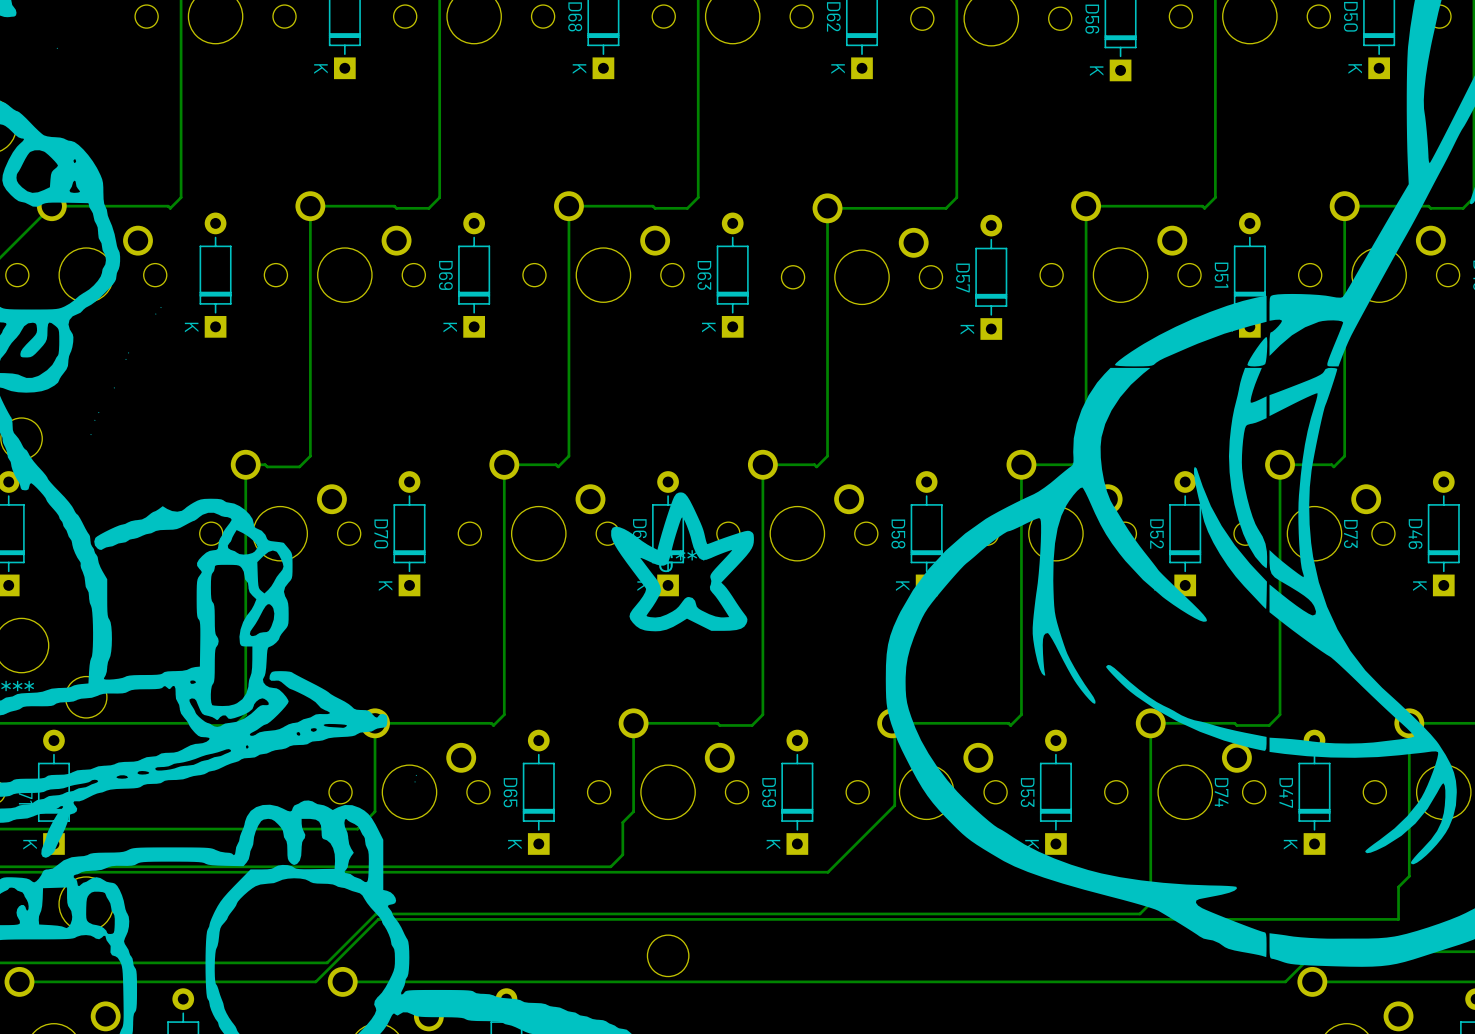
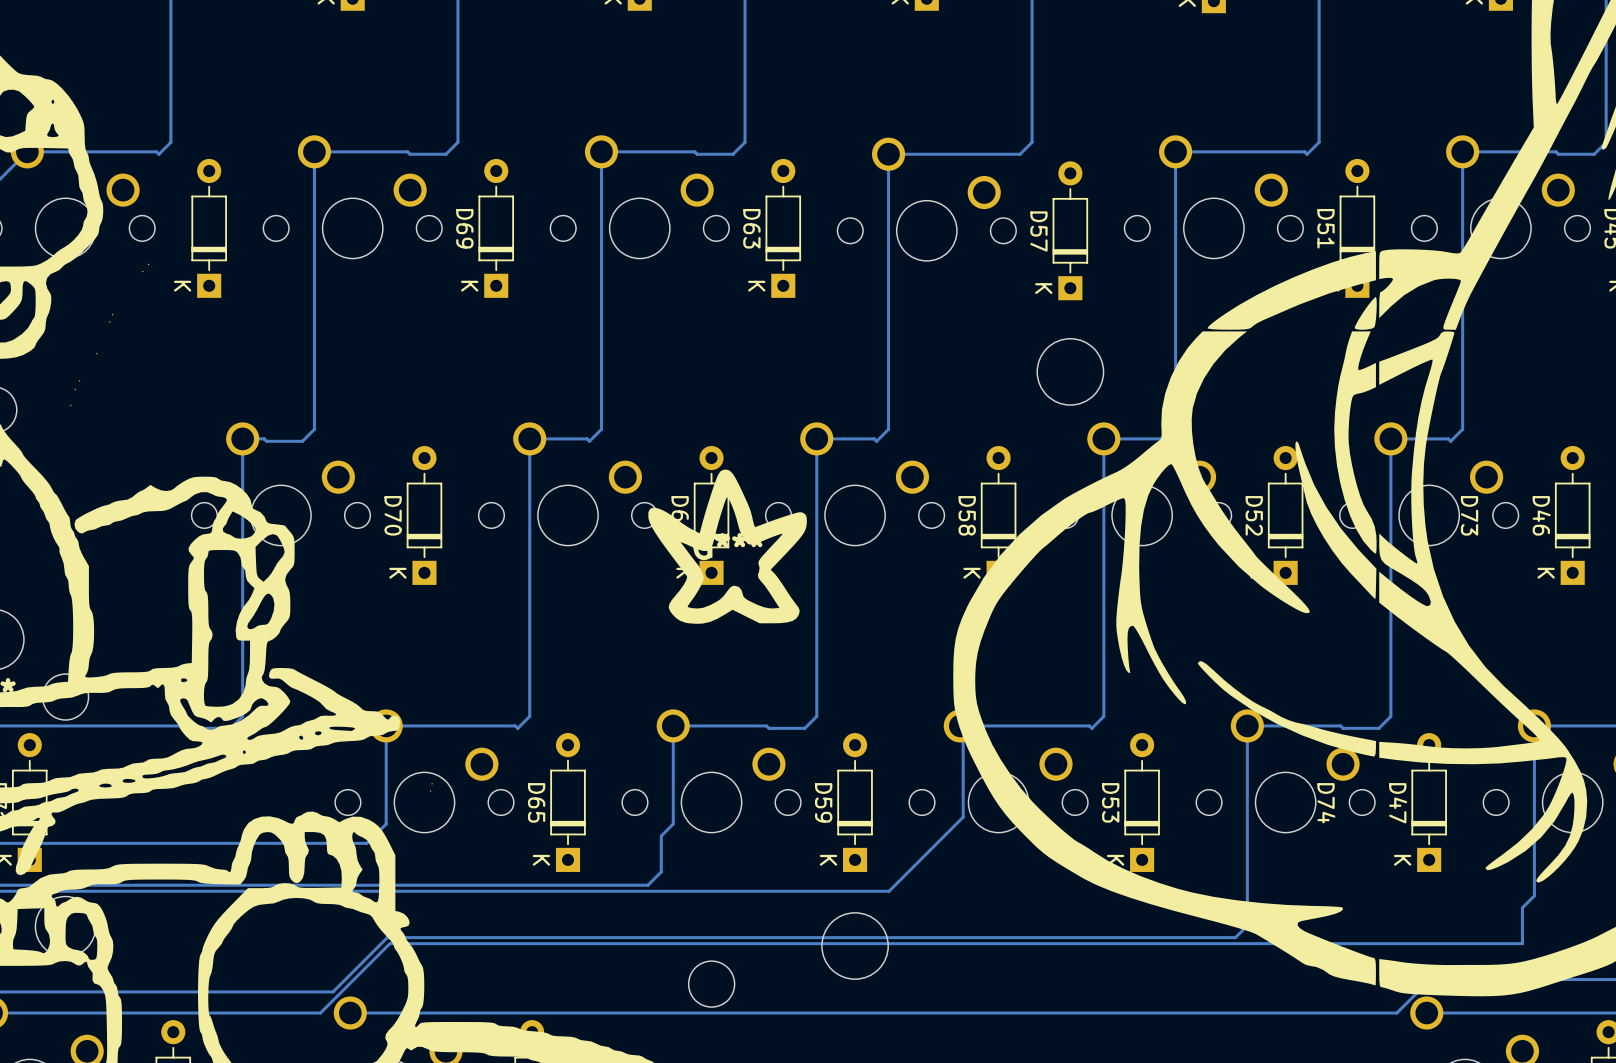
round board edge: none -> [1036, 338, 1104, 406]
round board edge: none -> [821, 912, 889, 980]

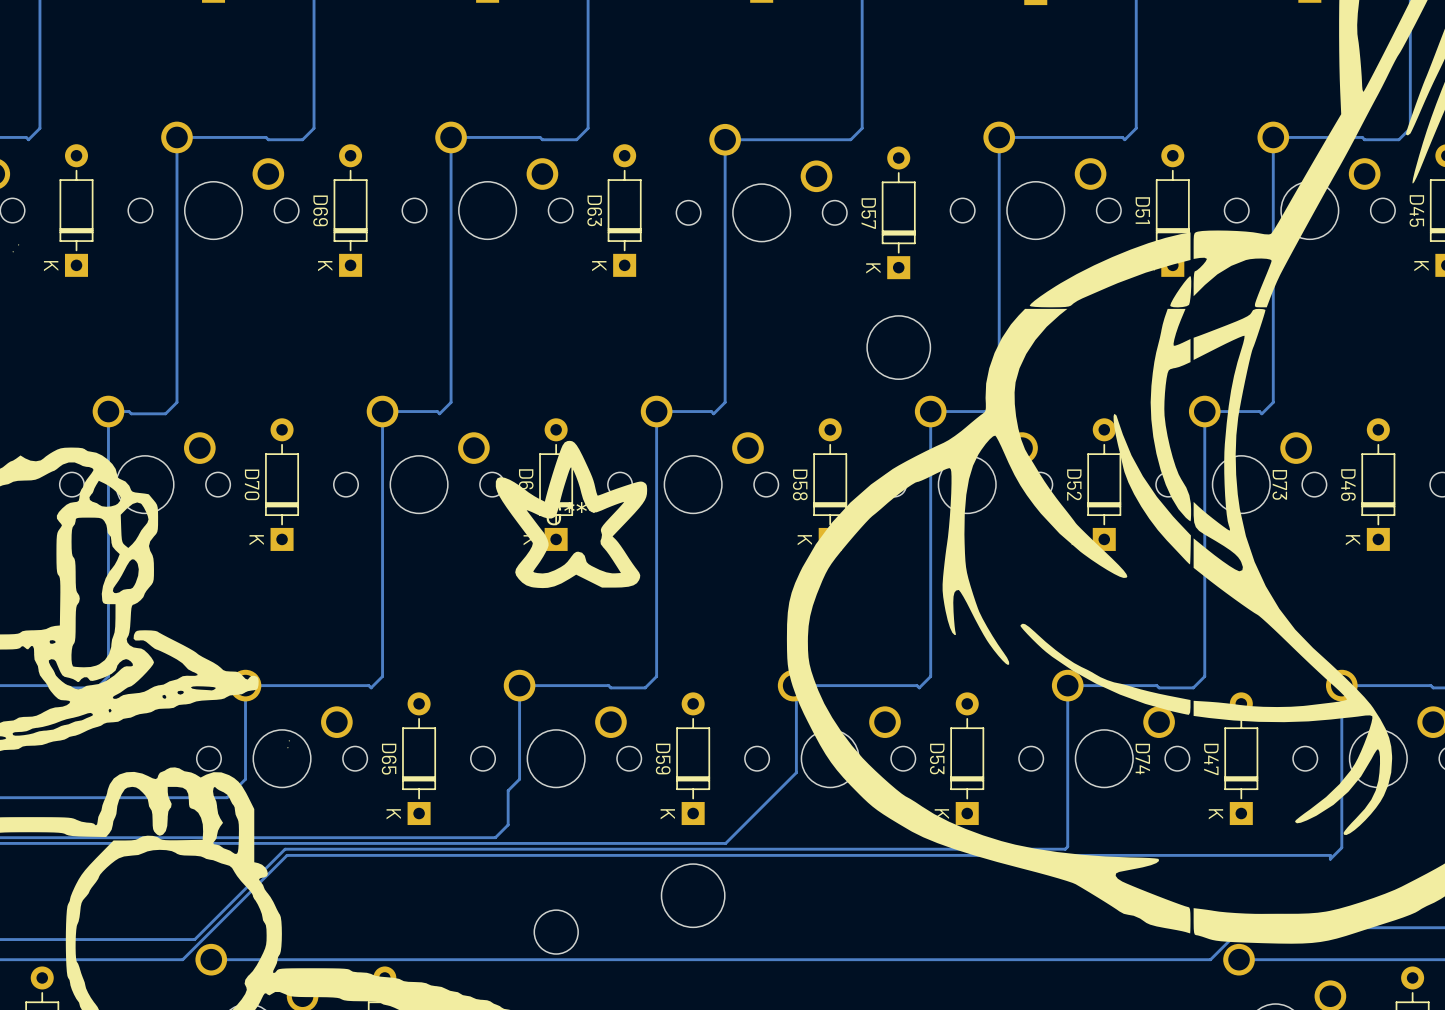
track: (1247, 894) (1247, 925) (1235, 937) (387, 937) -> (1067, 846) (1065, 849) (285, 849) (246, 887)
track: (1522, 907) (1522, 943) (389, 943) -> (1330, 859) (1330, 855) (287, 855) (249, 893)

